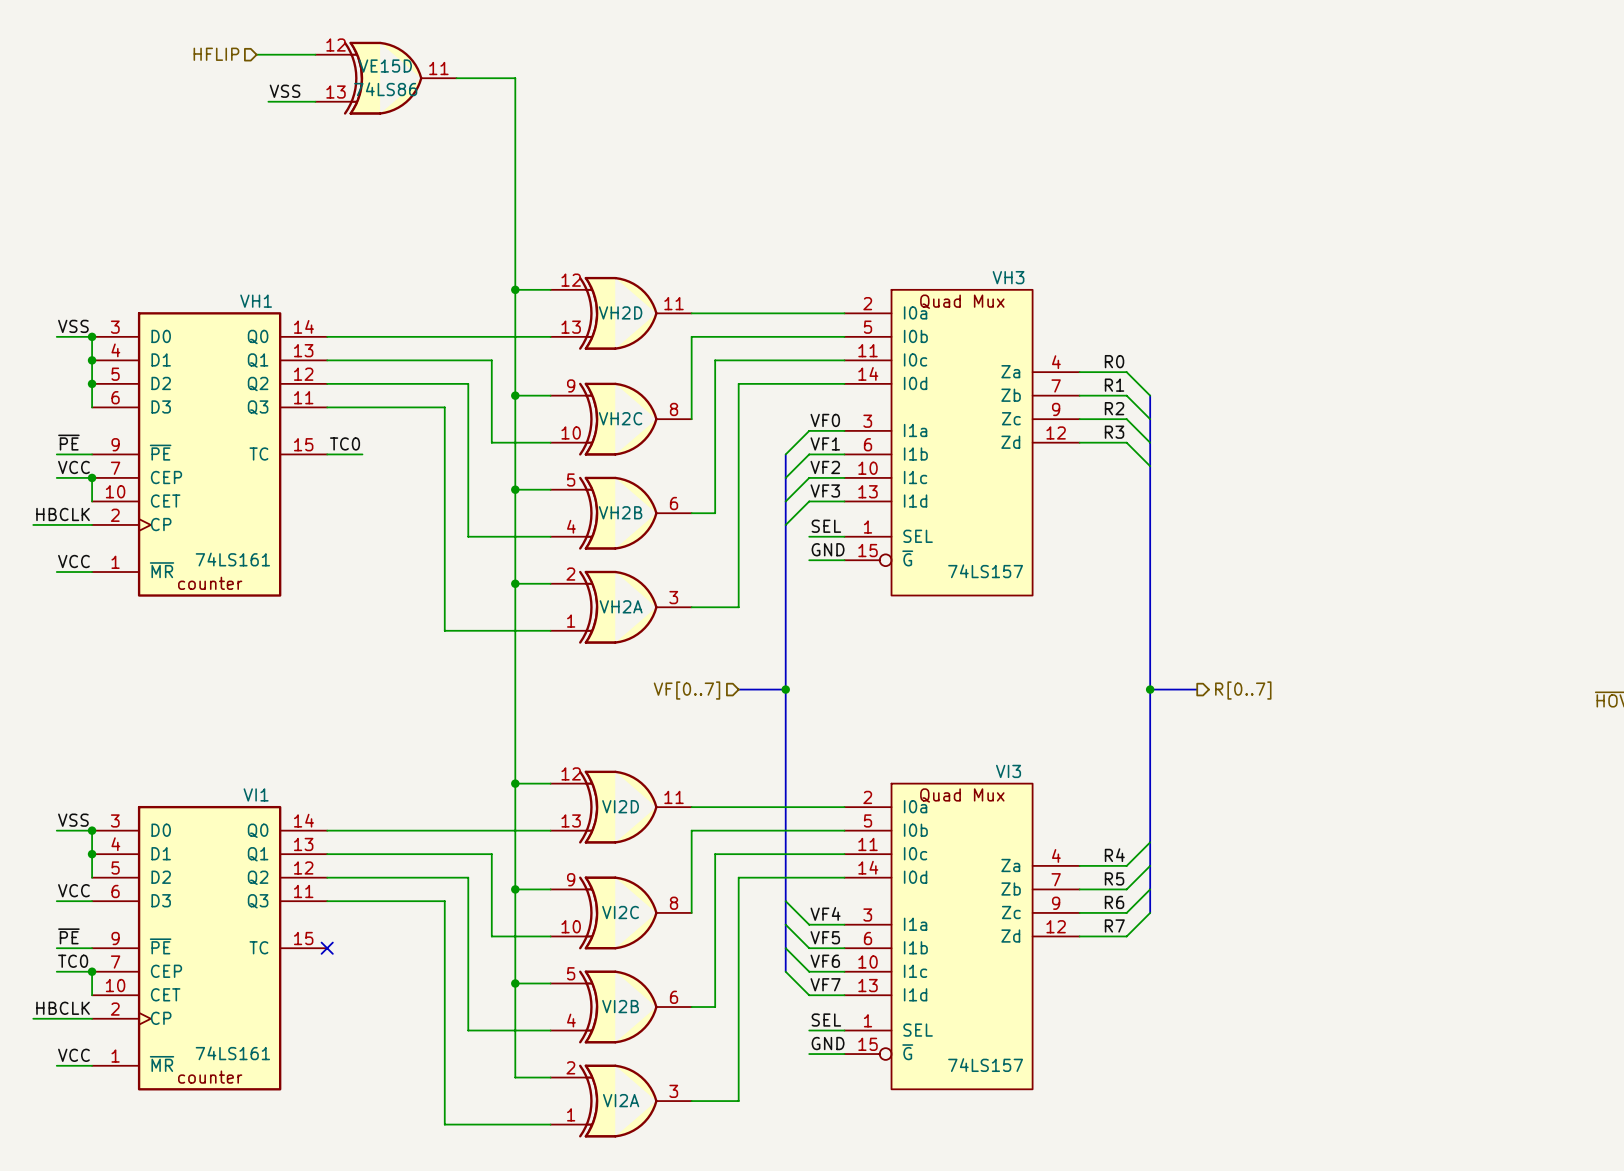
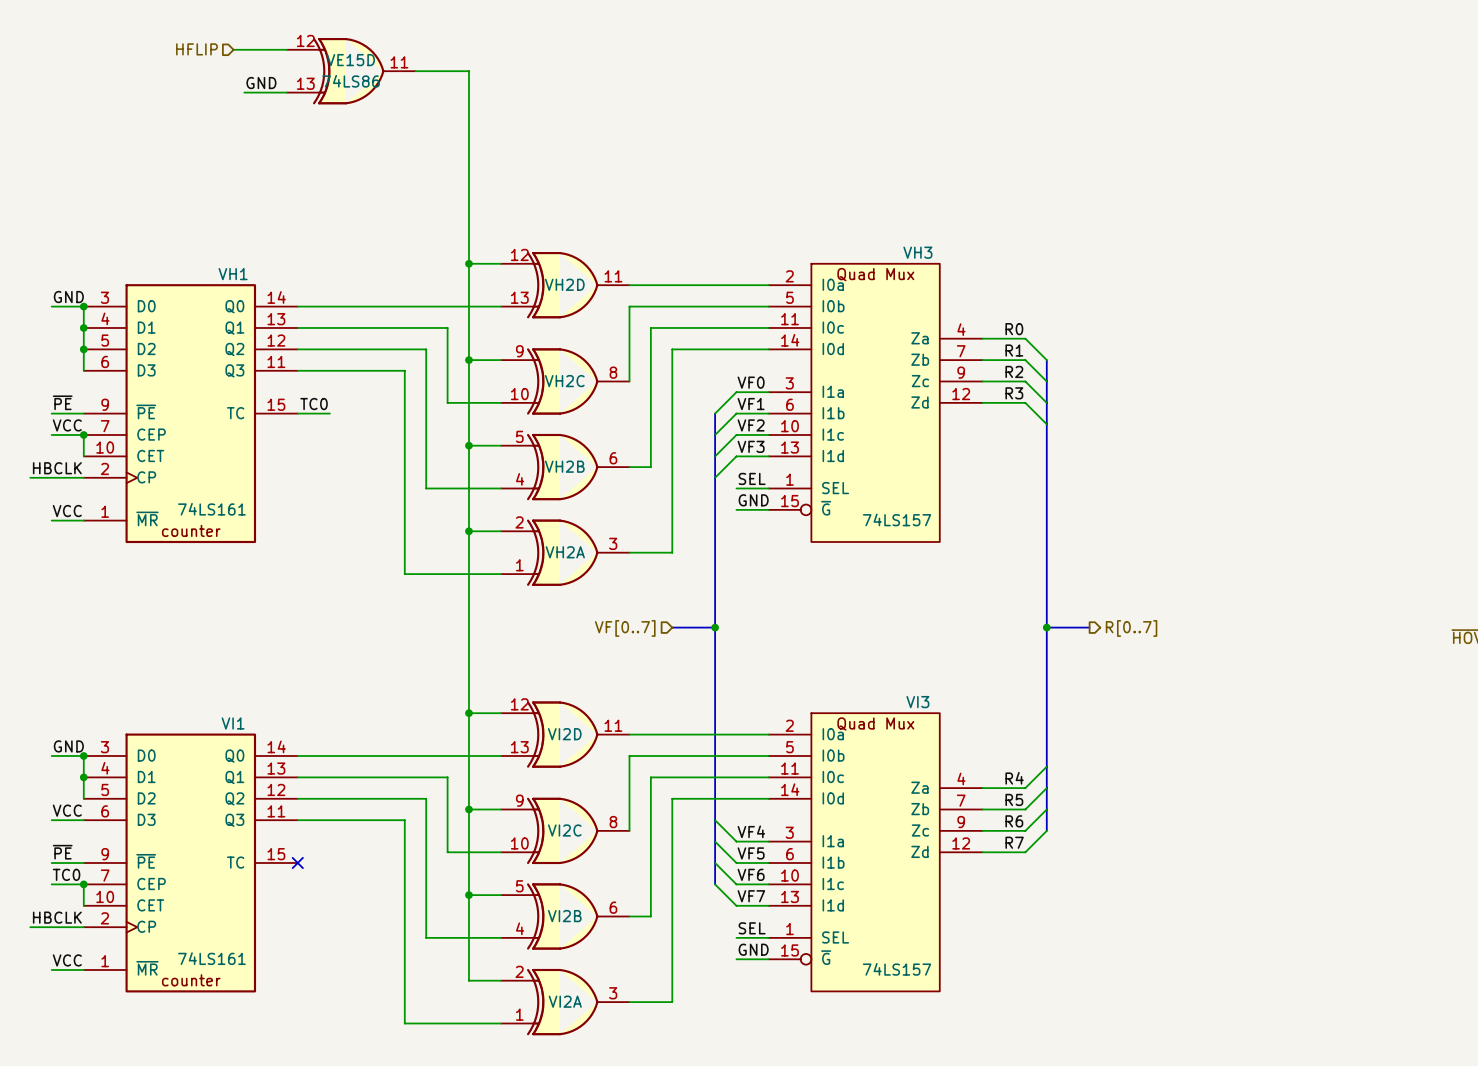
label: VSS (285, 91) -> GND (261, 83)
label: VSS (73, 326) -> GND (68, 297)
label: VSS (73, 820) -> GND (68, 746)

